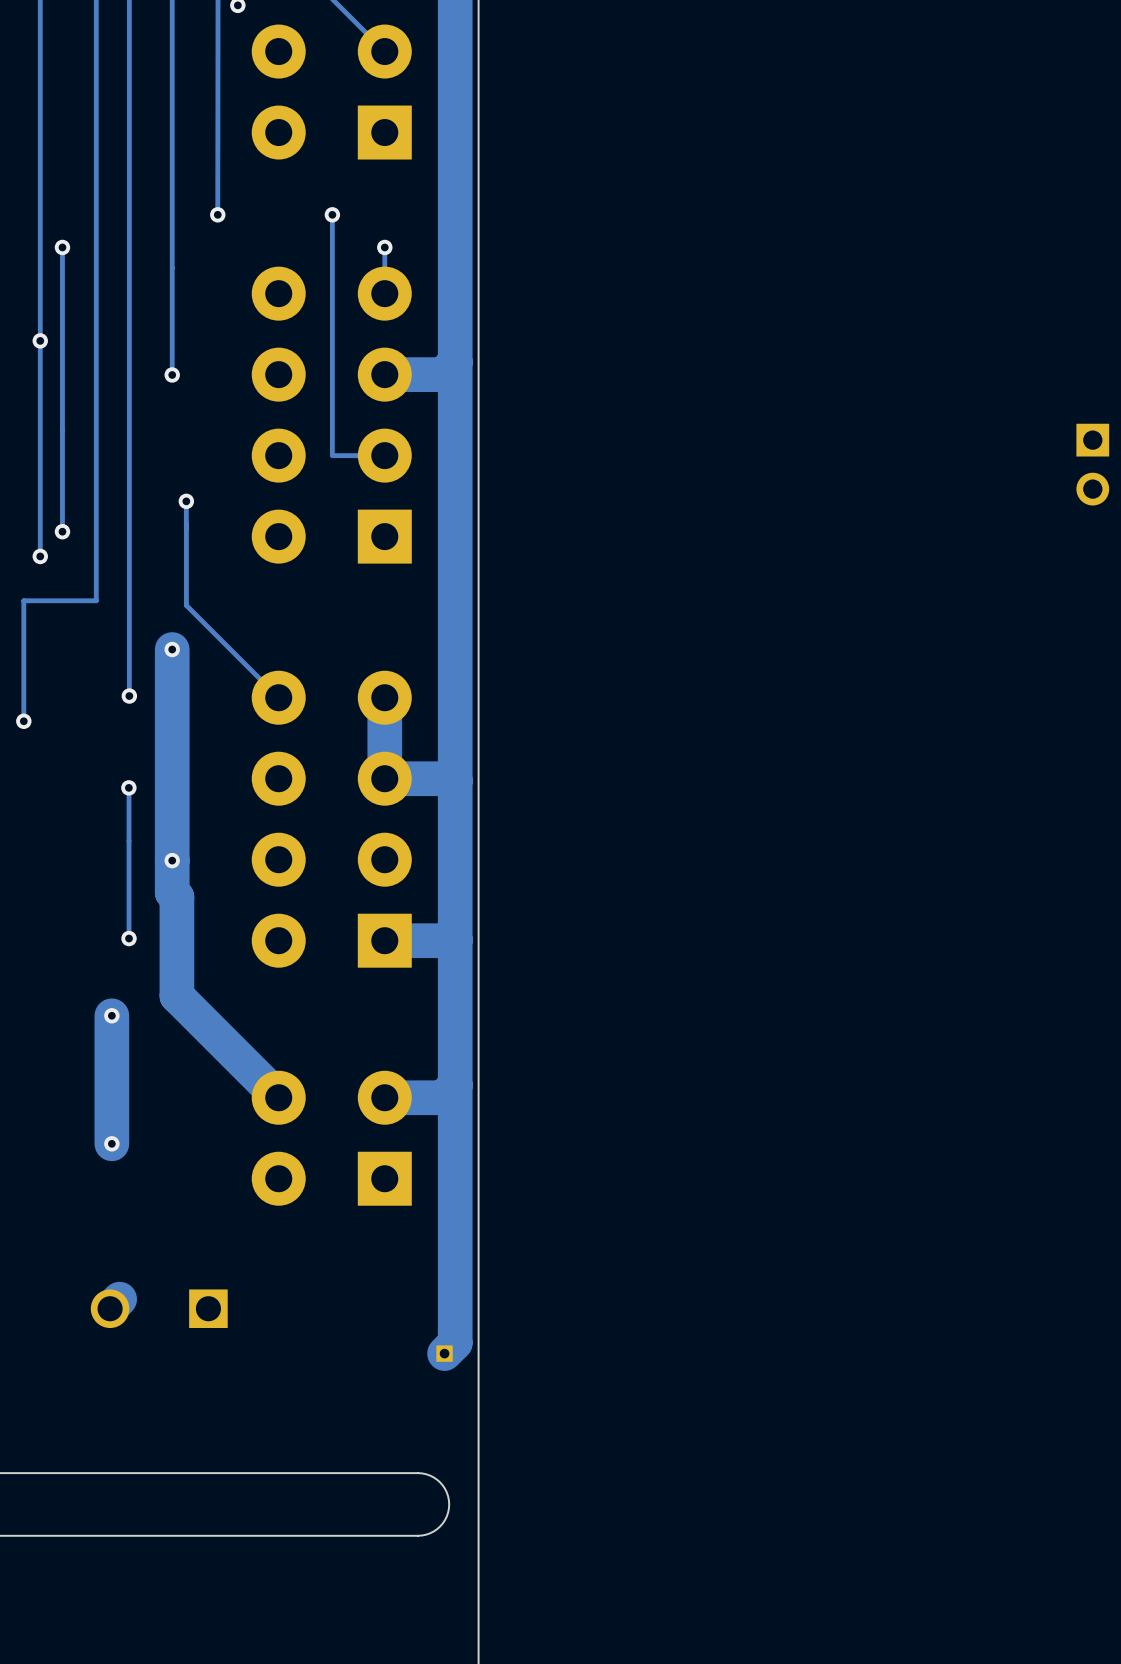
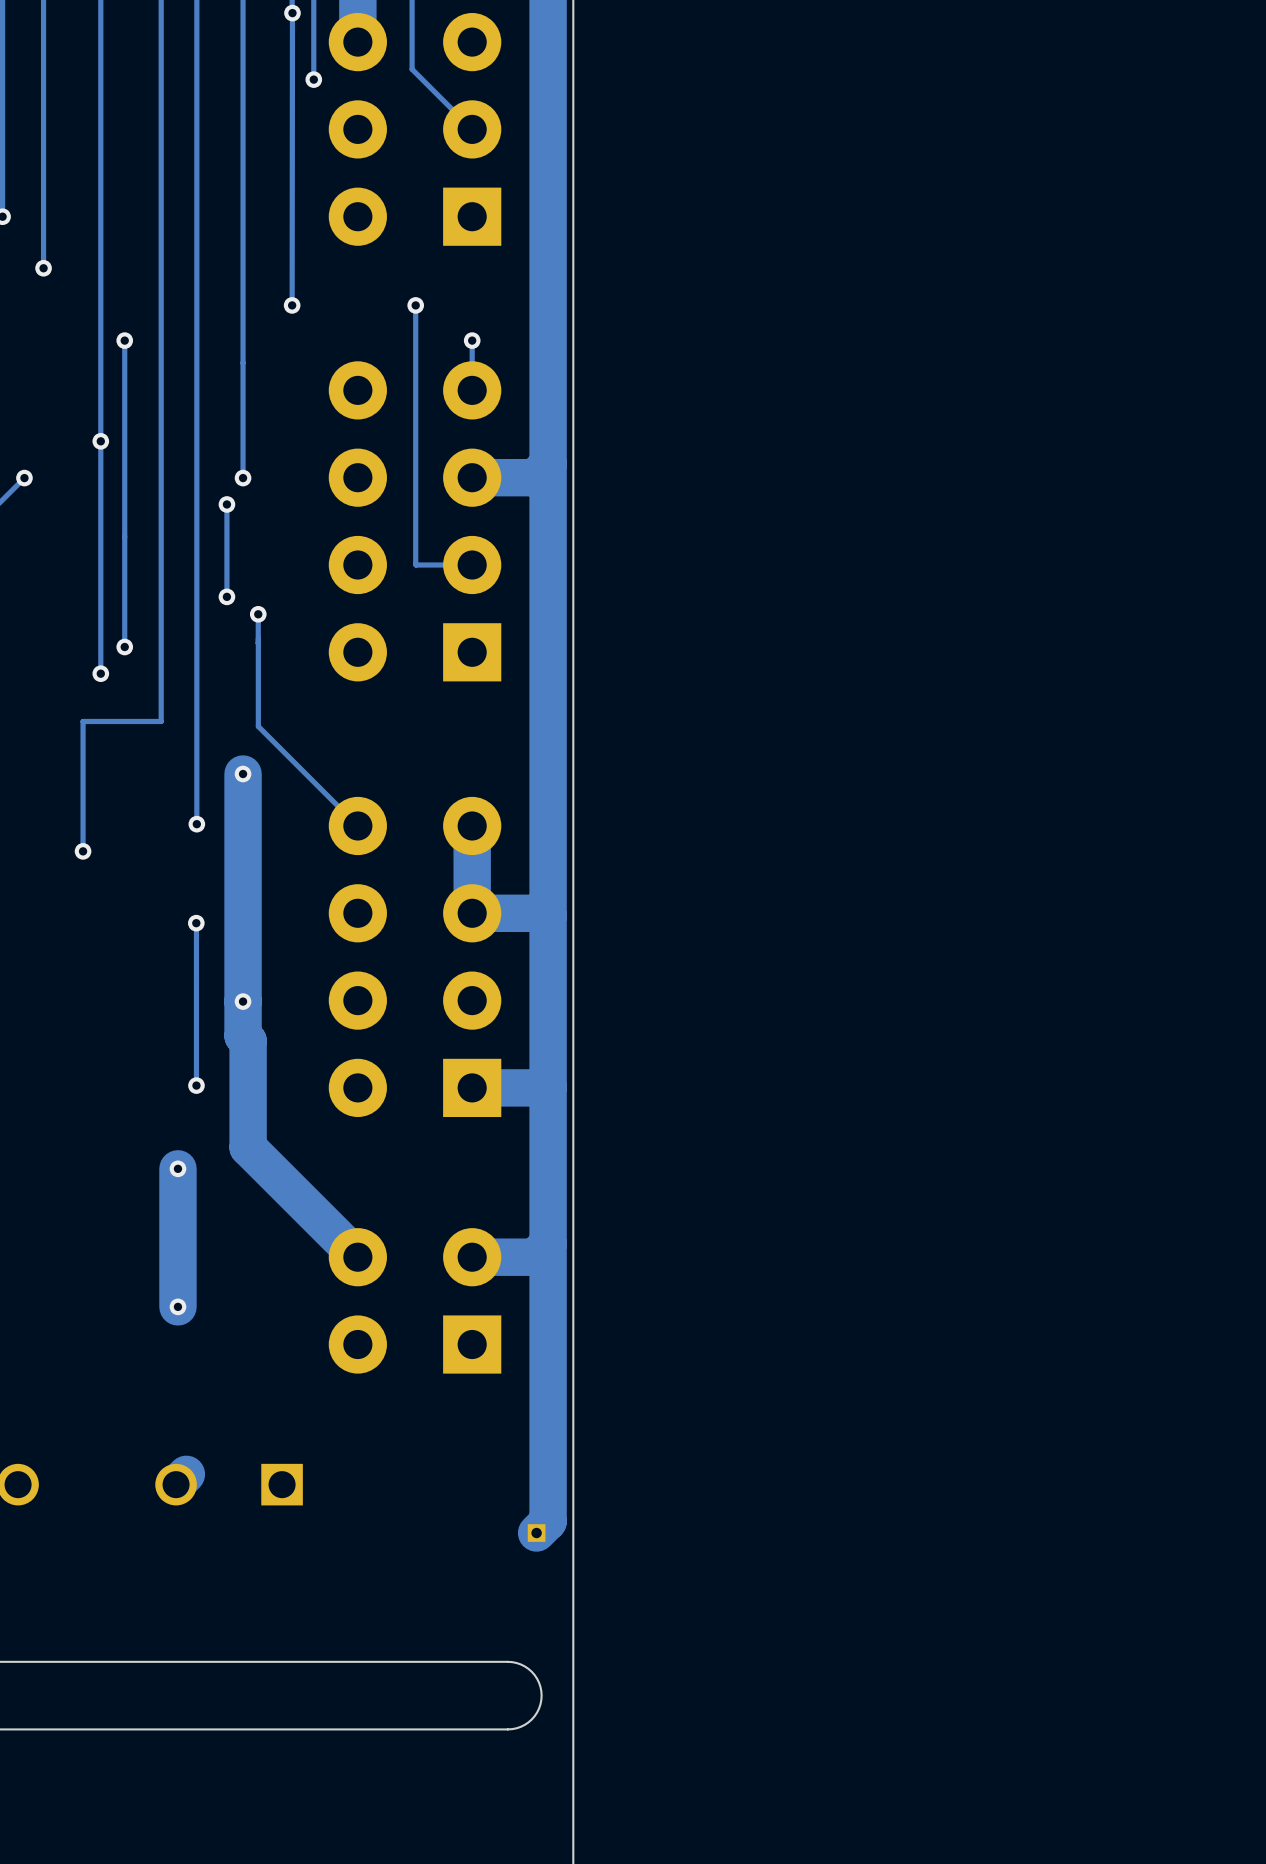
track: none -> (226, 504) (226, 596)
via: none -> (226, 504)
part: (1092, 464) -> none
via: none -> (226, 596)

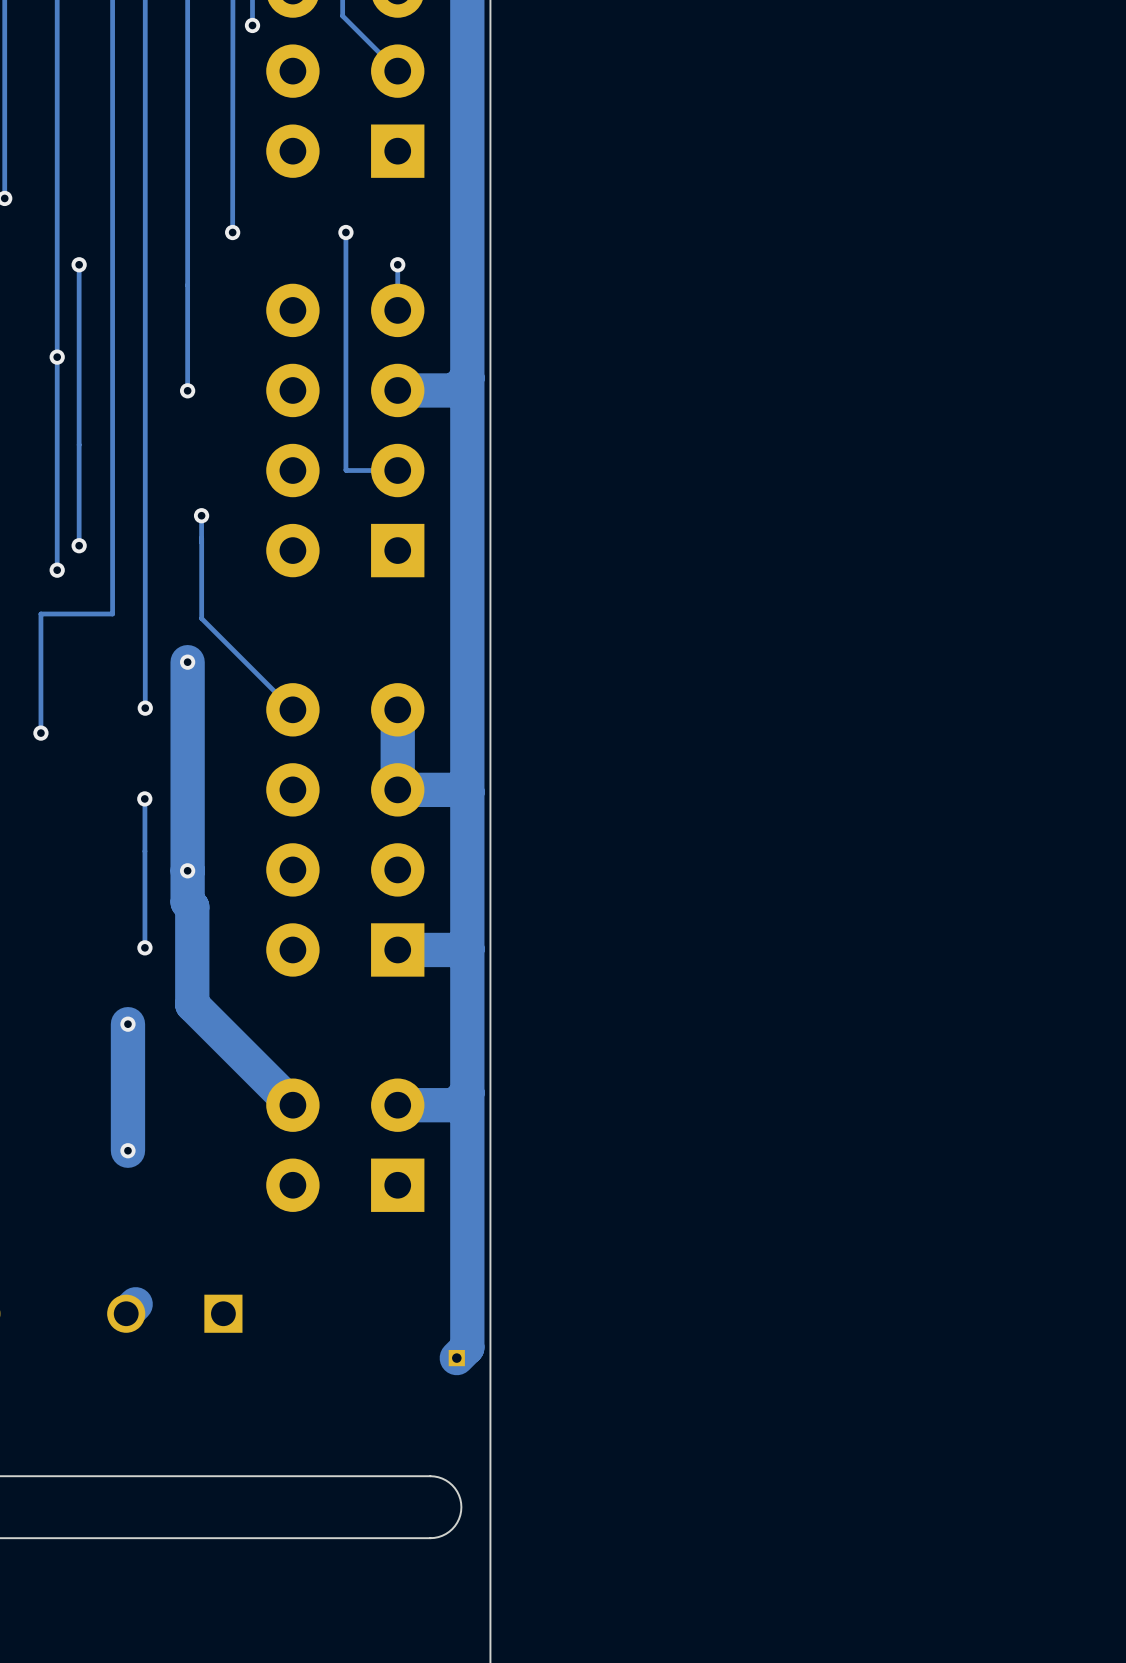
track: (226, 504) (226, 596) -> none
via: (226, 504) -> none
via: (226, 596) -> none

